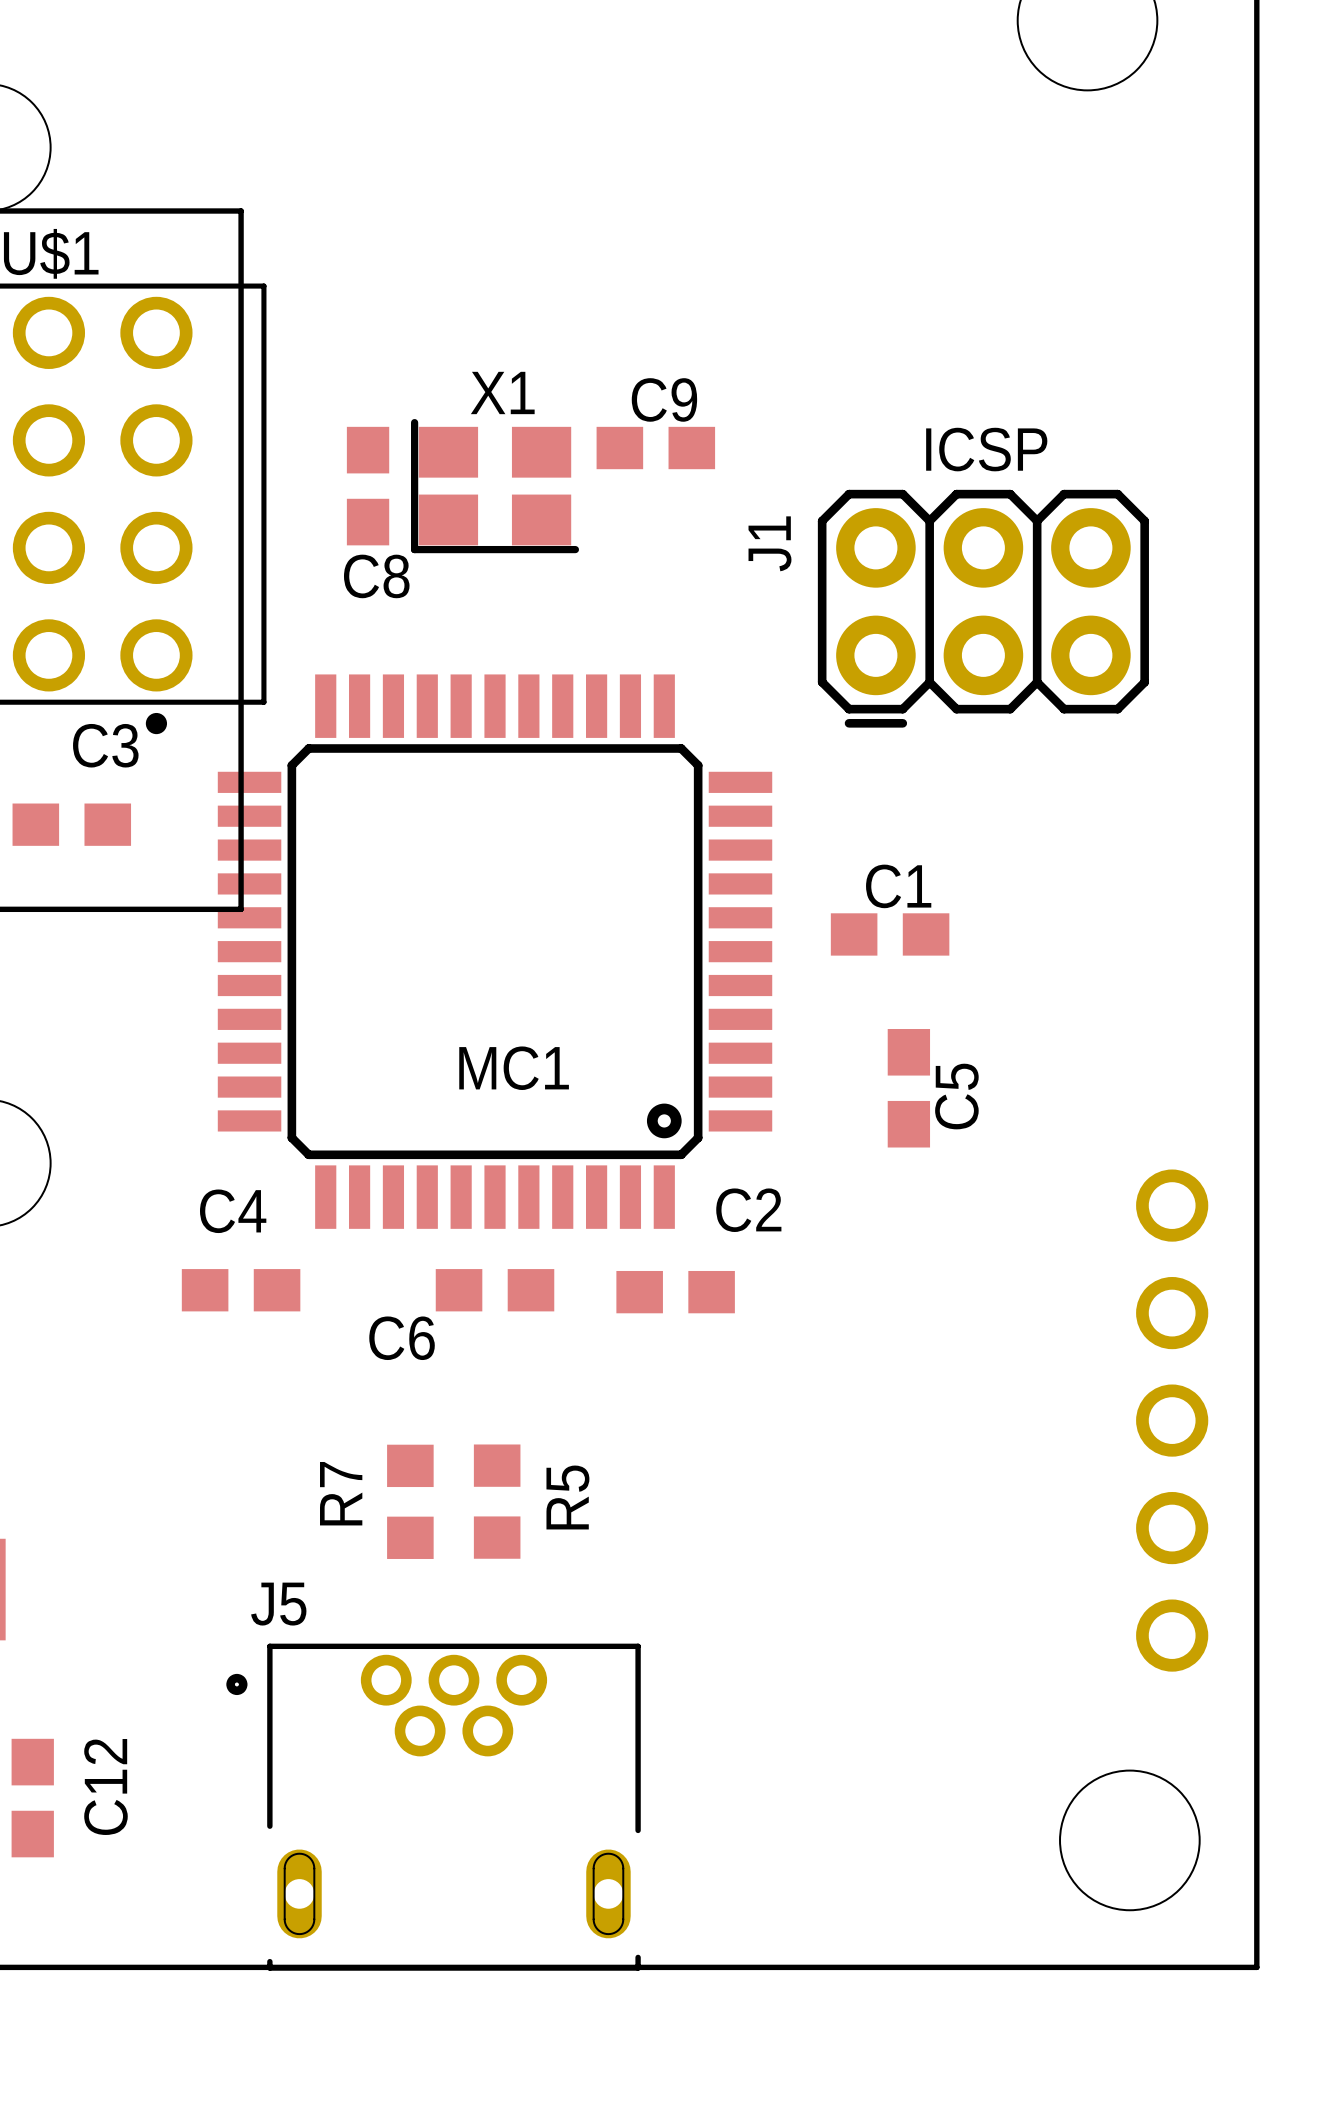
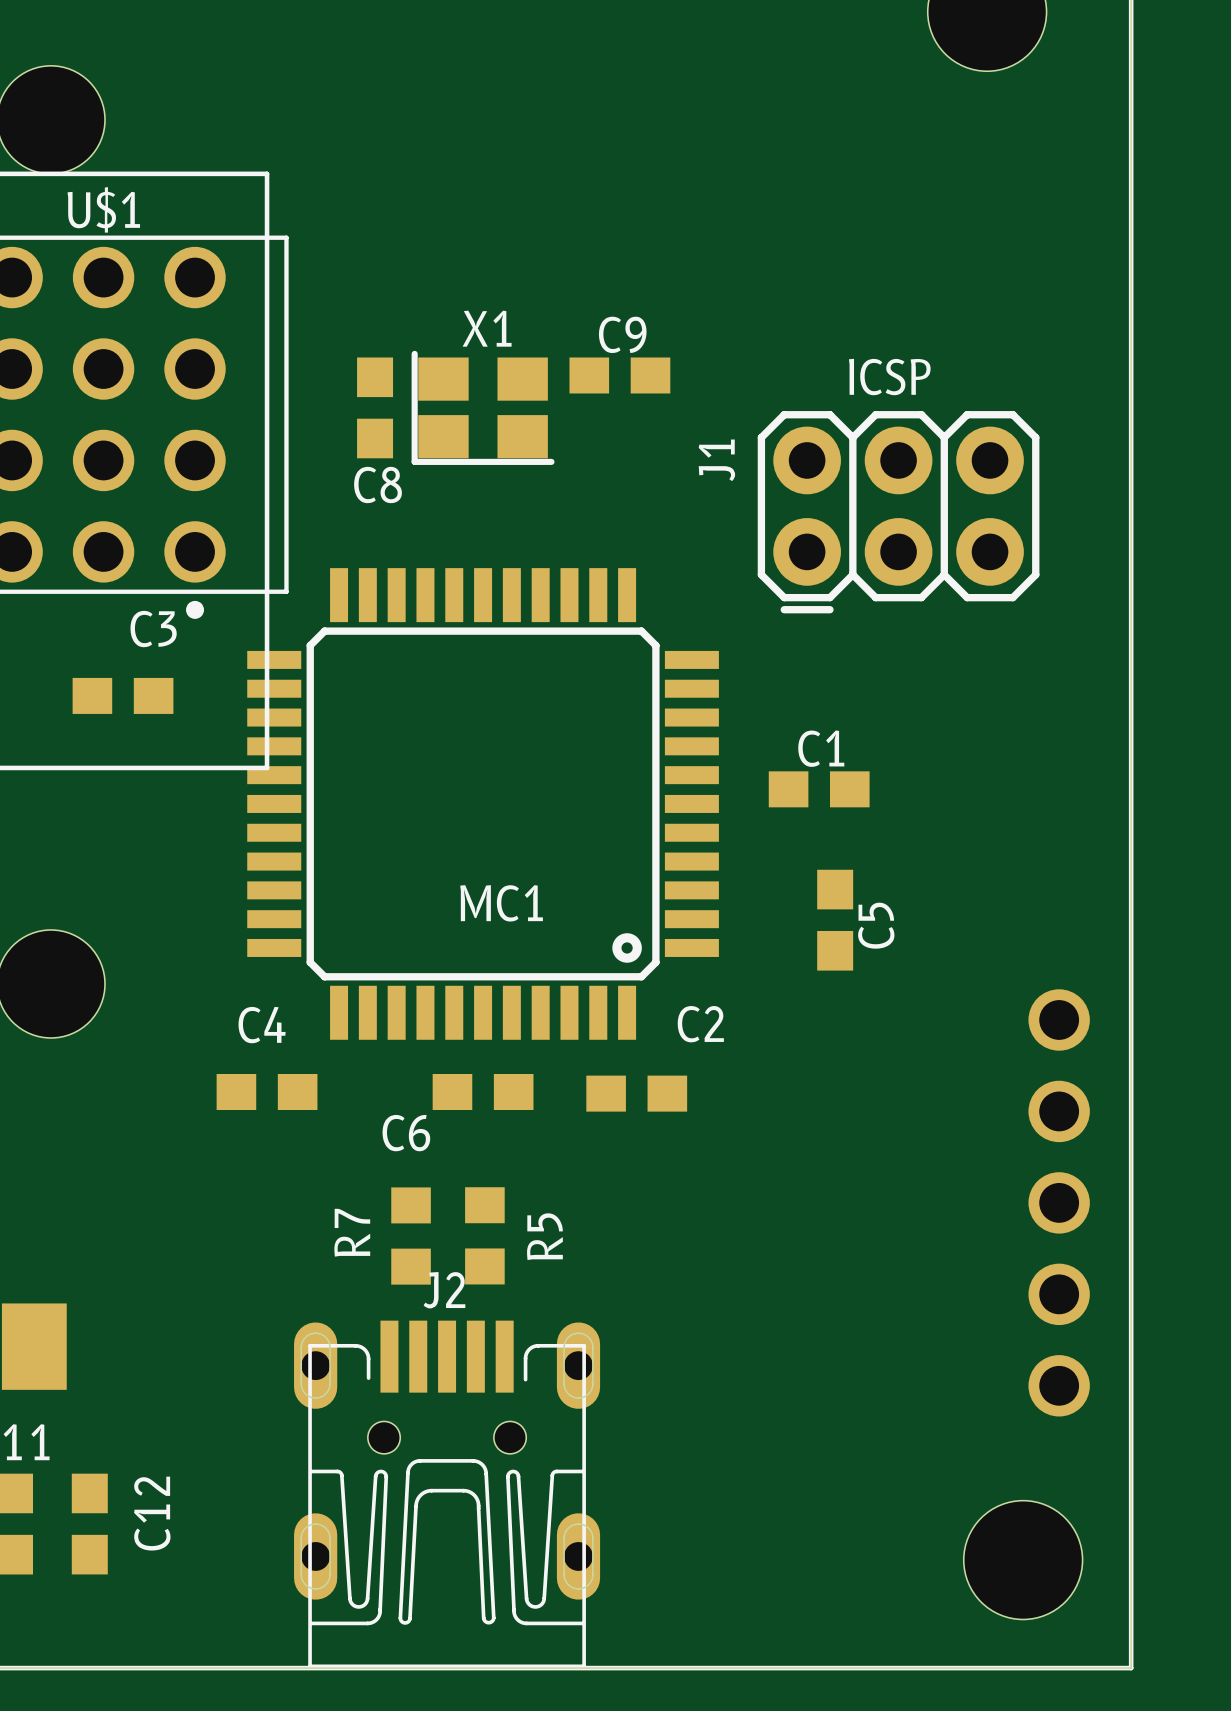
R7 position: (410, 1501) -> (411, 1236)
R5 position: (497, 1501) -> (484, 1235)
J2: none -> (447, 1494)
J5: (433, 1807) -> none

